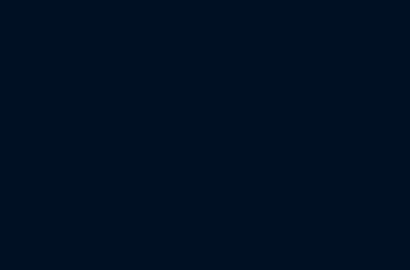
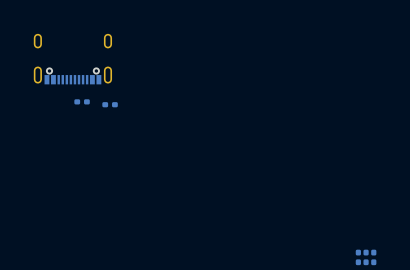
part: none -> (72, 59)
part: none -> (82, 101)
part: none -> (110, 104)
part: none -> (358, 257)
part: none -> (366, 257)
part: none -> (373, 257)

